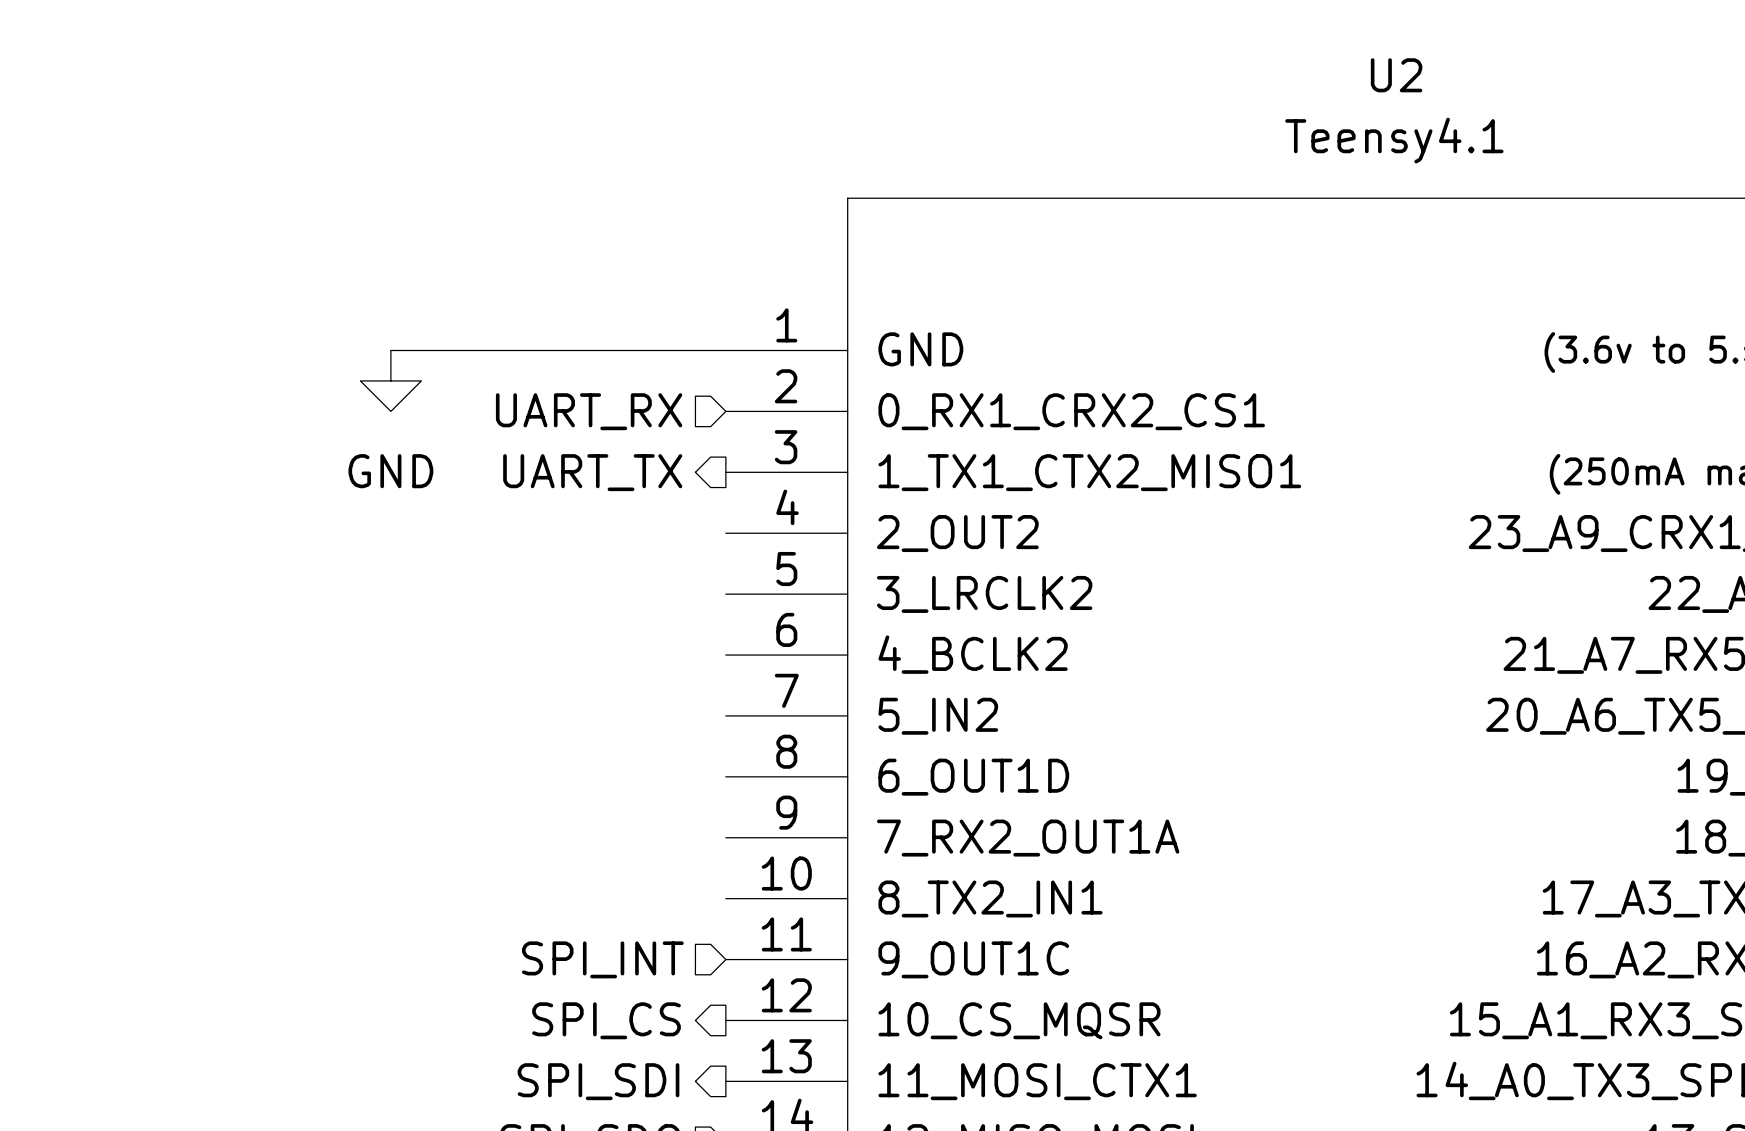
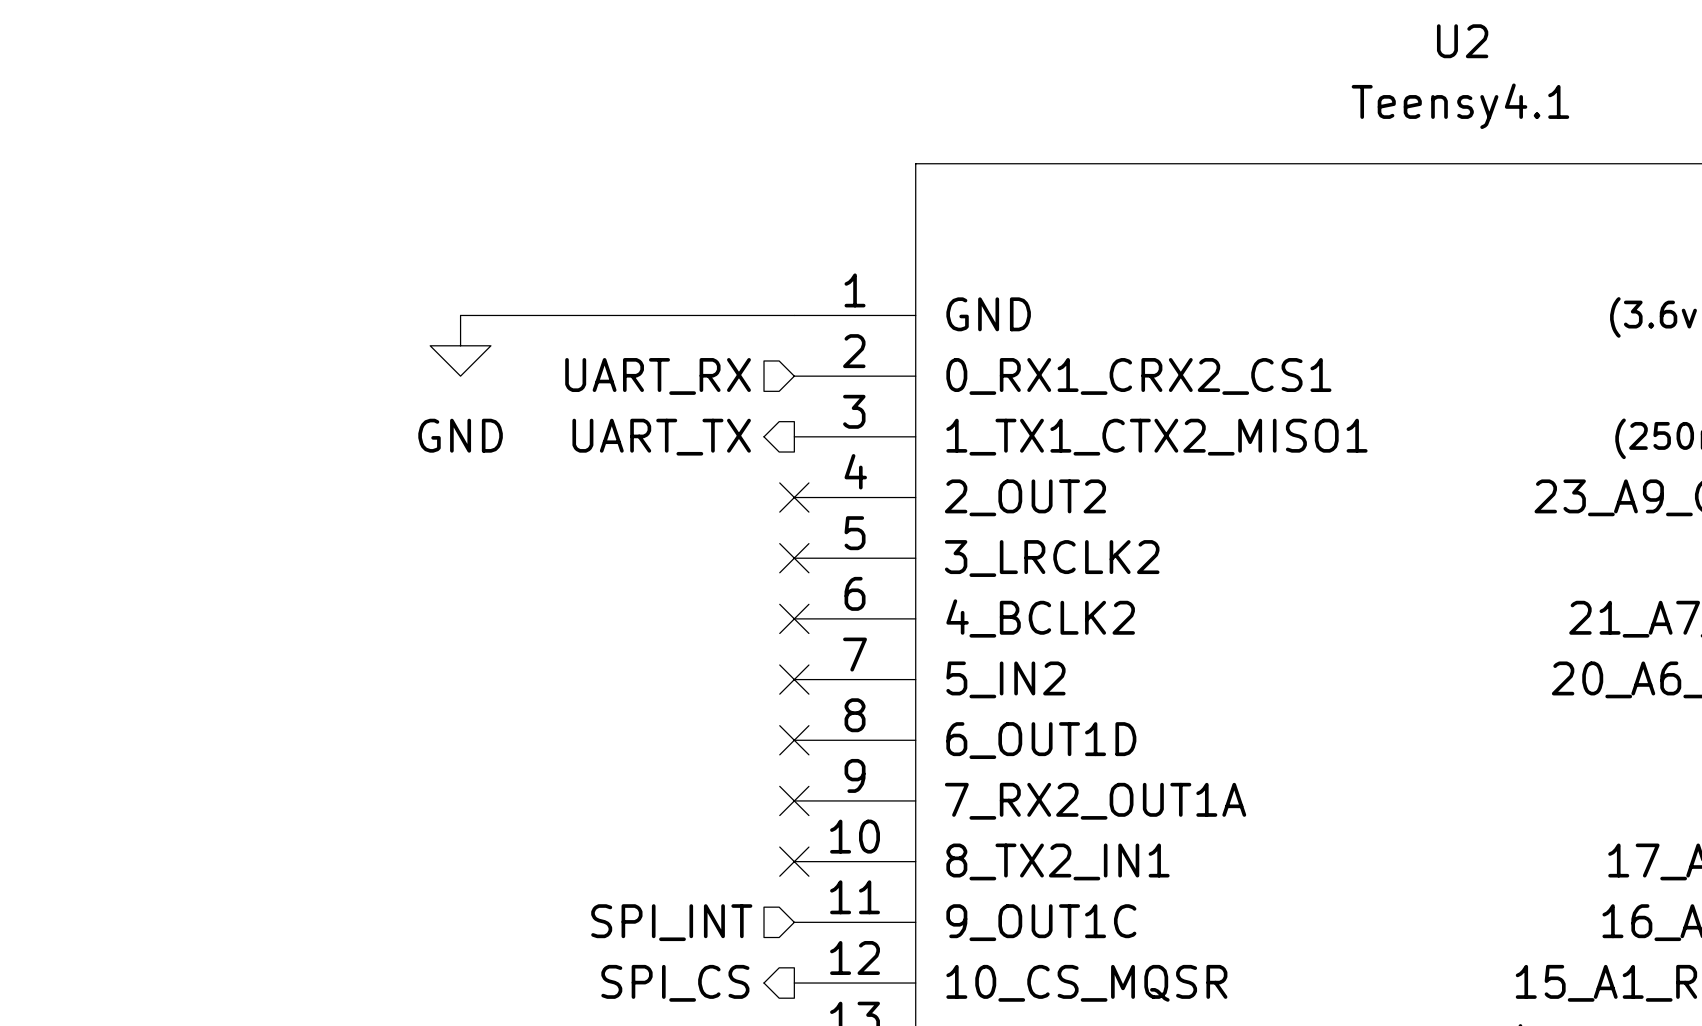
no-connect mark: none -> (794, 497)
no-connect mark: none -> (794, 558)
no-connect mark: none -> (794, 618)
no-connect mark: none -> (794, 679)
no-connect mark: none -> (794, 740)
no-connect mark: none -> (794, 800)
no-connect mark: none -> (794, 861)

